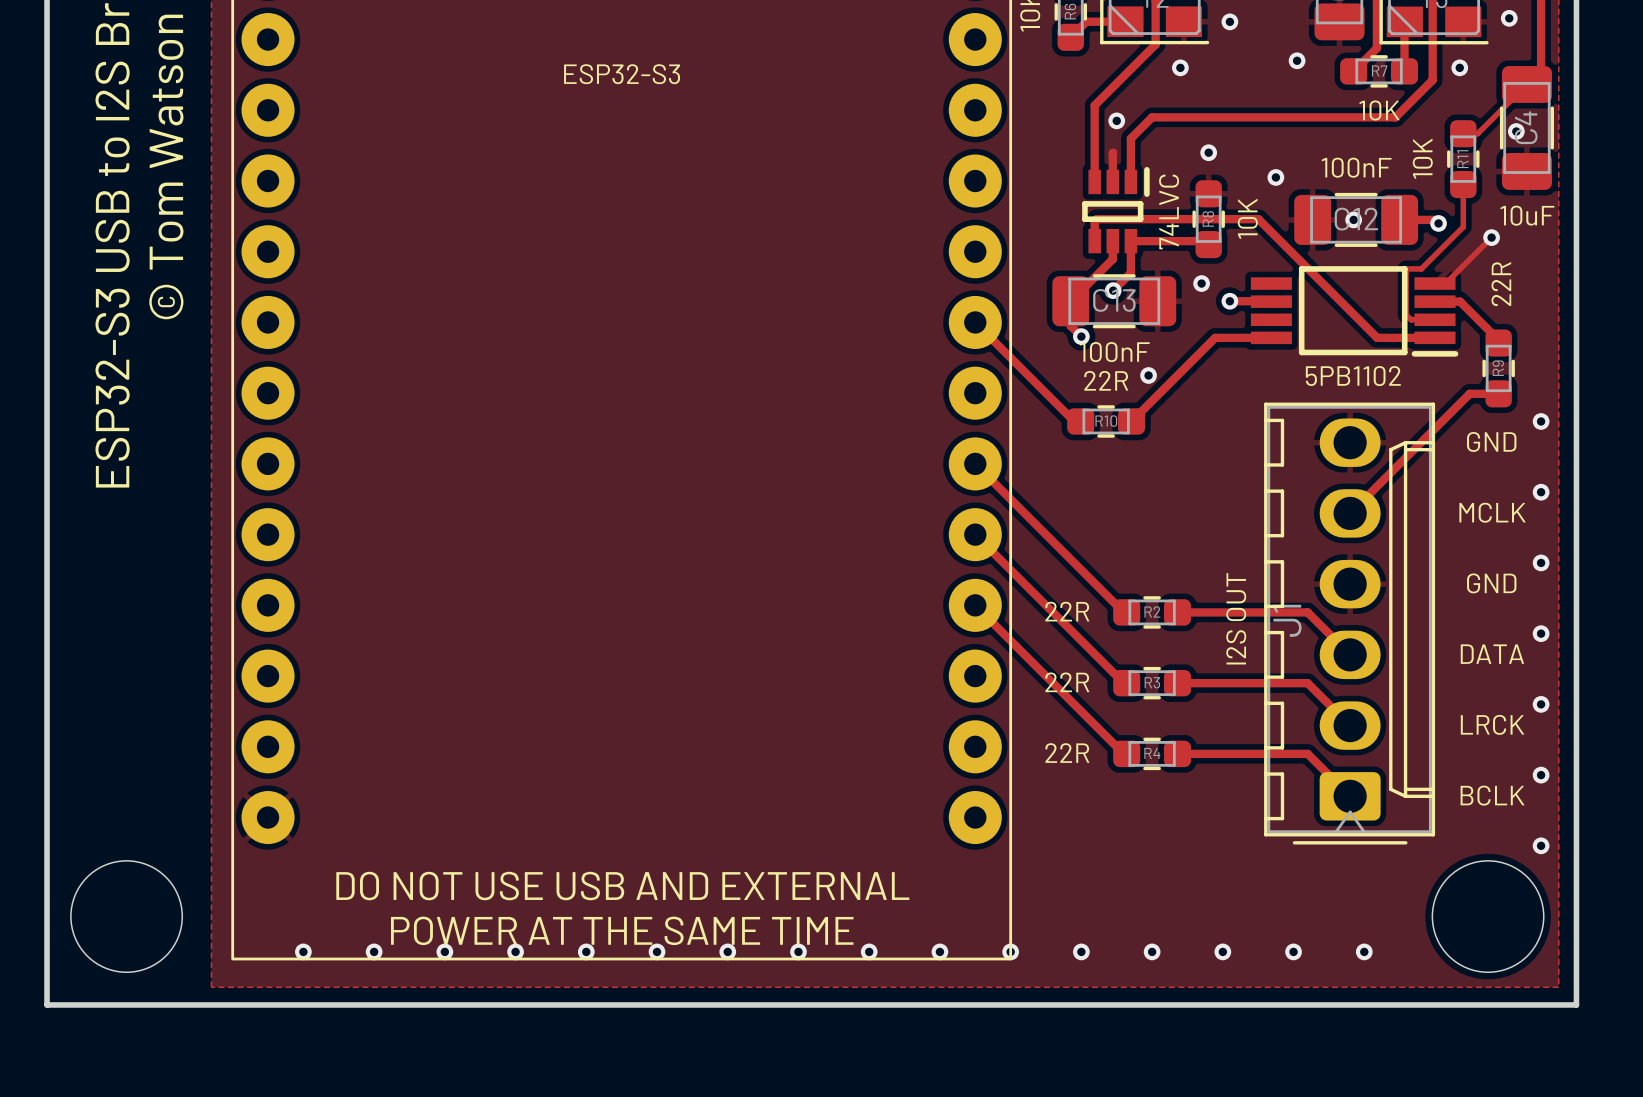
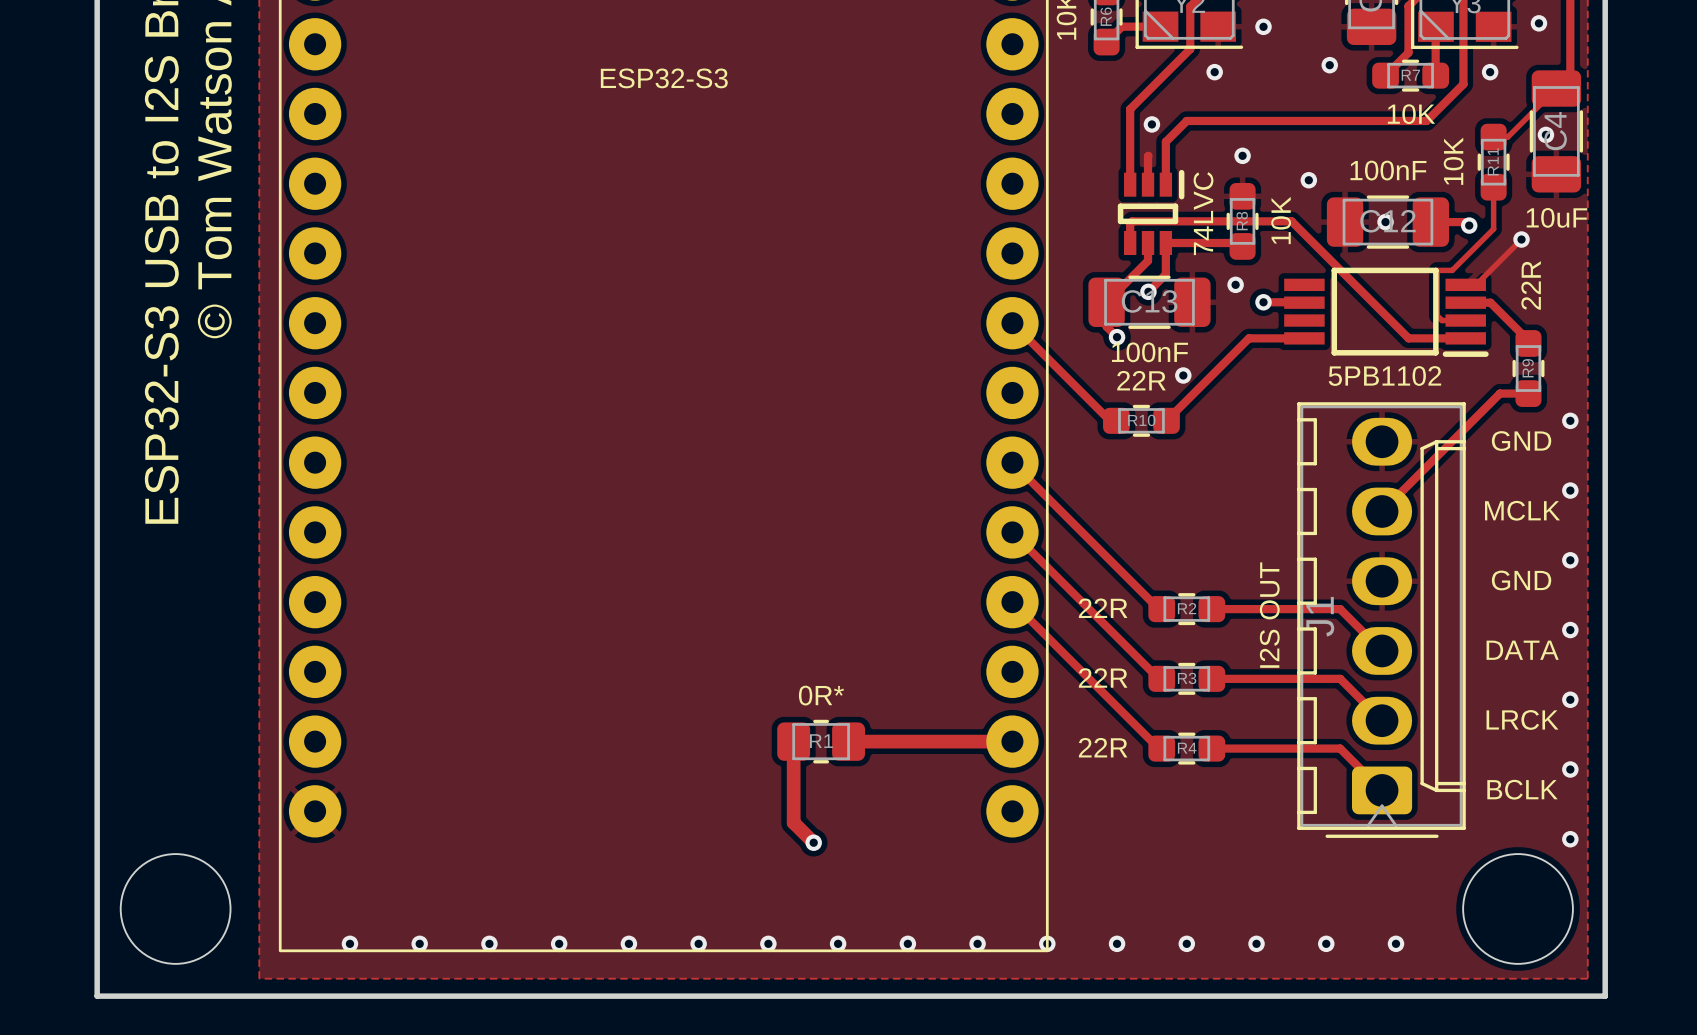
track: none -> (793, 741) (793, 822) (813, 842)
R1: none -> 0R* (821, 741)
track: none -> (848, 741) (1012, 741)
via: none -> (813, 842)
text: DO NOT USE USB AND EXTERNAL (622, 886) -> none
text: POWER AT THE SAME TIME (622, 930) -> none

